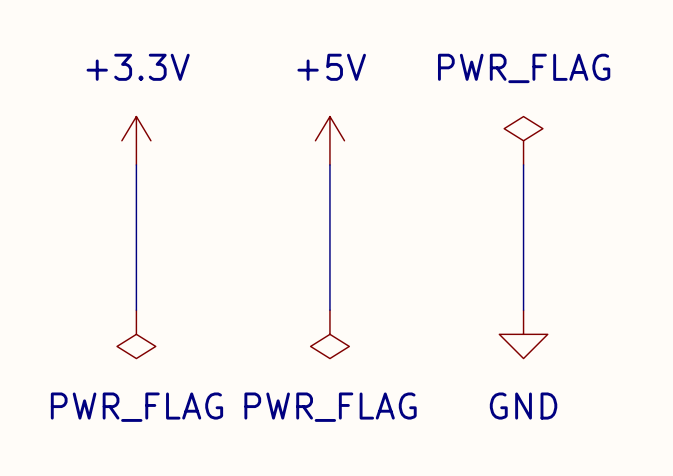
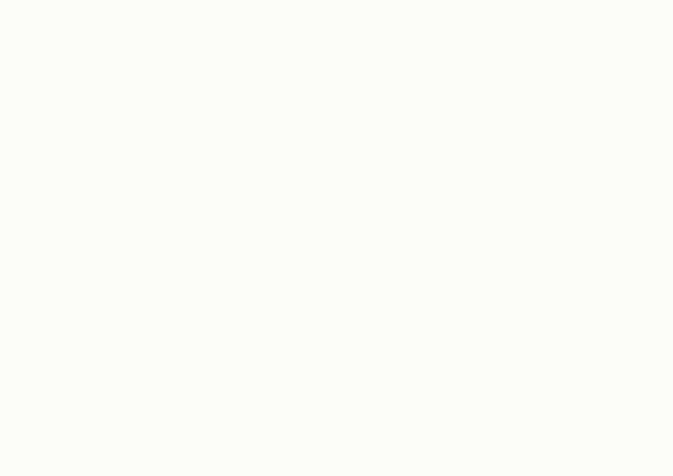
power symbol: +3.3V (136, 140) -> none
power symbol: +5V (329, 140) -> none
power symbol: PWR_FLAG (523, 140) -> none
wire: (136, 164) (136, 310) -> none
wire: (329, 164) (329, 310) -> none
wire: (523, 164) (523, 310) -> none
power symbol: PWR_FLAG (136, 334) -> none
power symbol: PWR_FLAG (329, 334) -> none
power symbol: GND (523, 334) -> none

